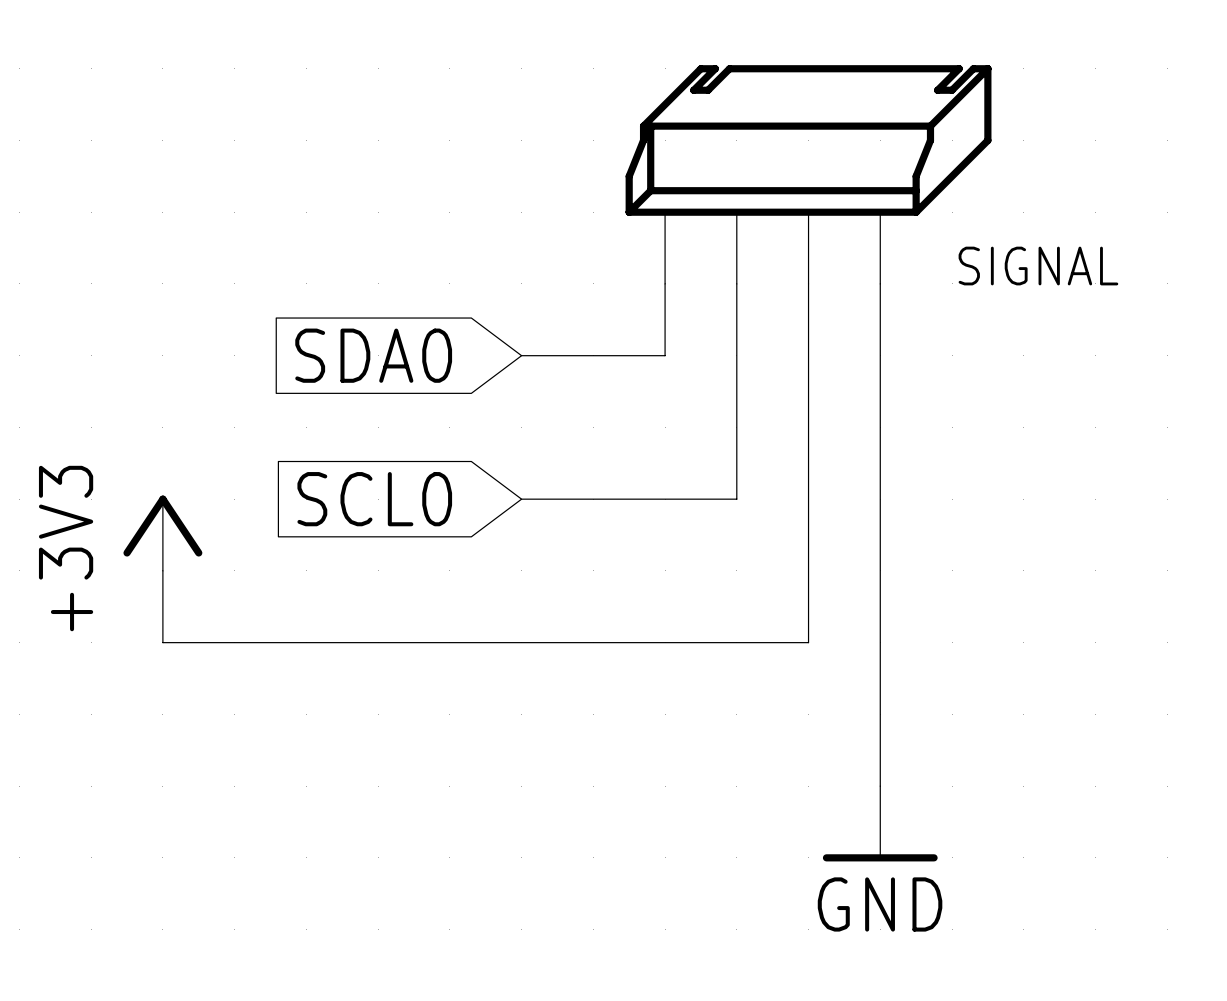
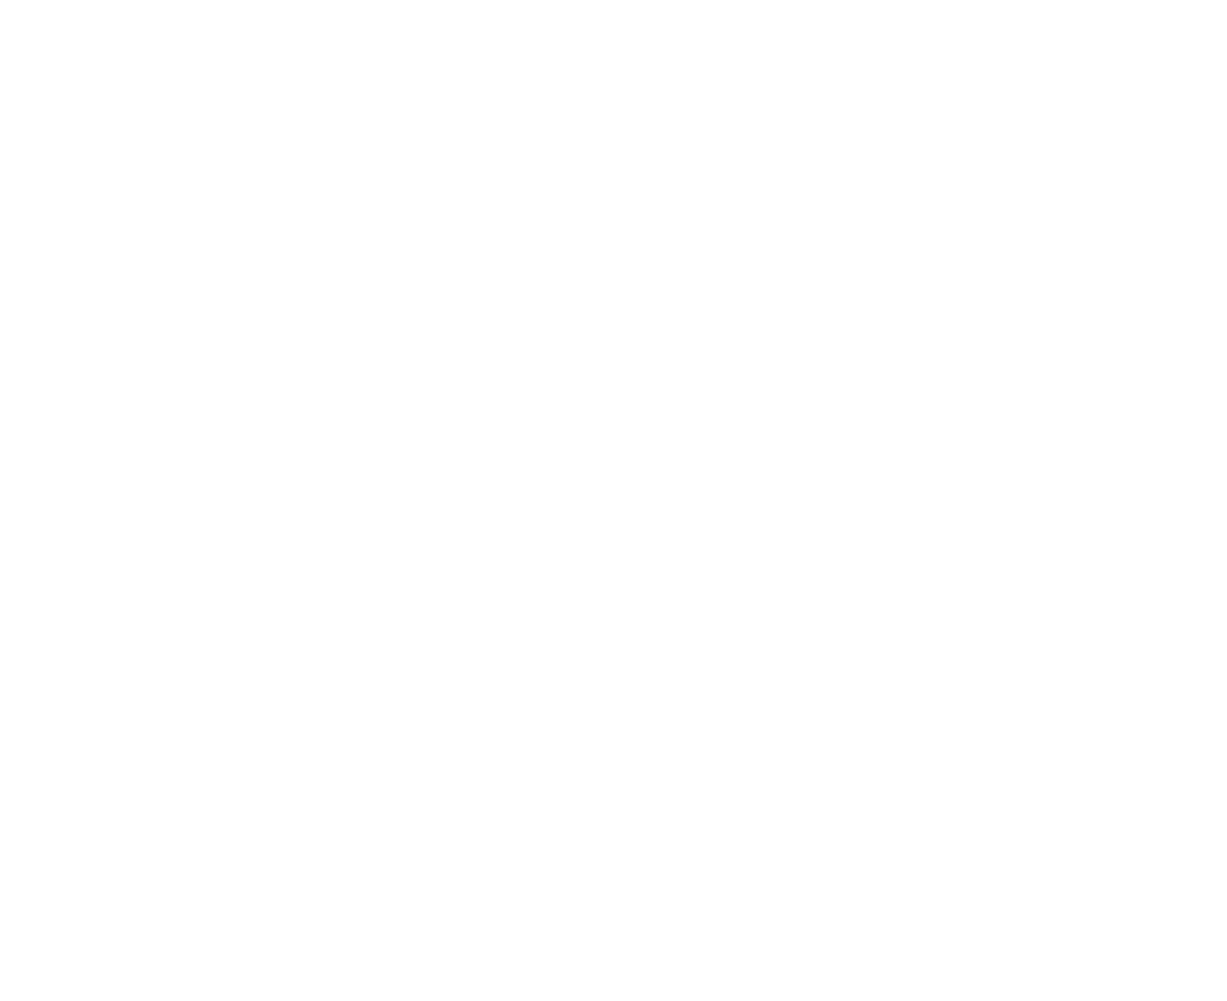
SIGNAL: (808, 174) -> none
wire: (665, 283) (665, 355) (521, 355) -> none
wire: (736, 283) (736, 499) (521, 499) -> none
wire: (808, 283) (808, 642) (162, 642) (162, 570) -> none
wire: (880, 283) (880, 786) -> none
global label: SDA0 (373, 355) -> none
global label: SCL0 (374, 499) -> none
power symbol: +3V3 (162, 533) -> none
power symbol: GND (880, 823) -> none

